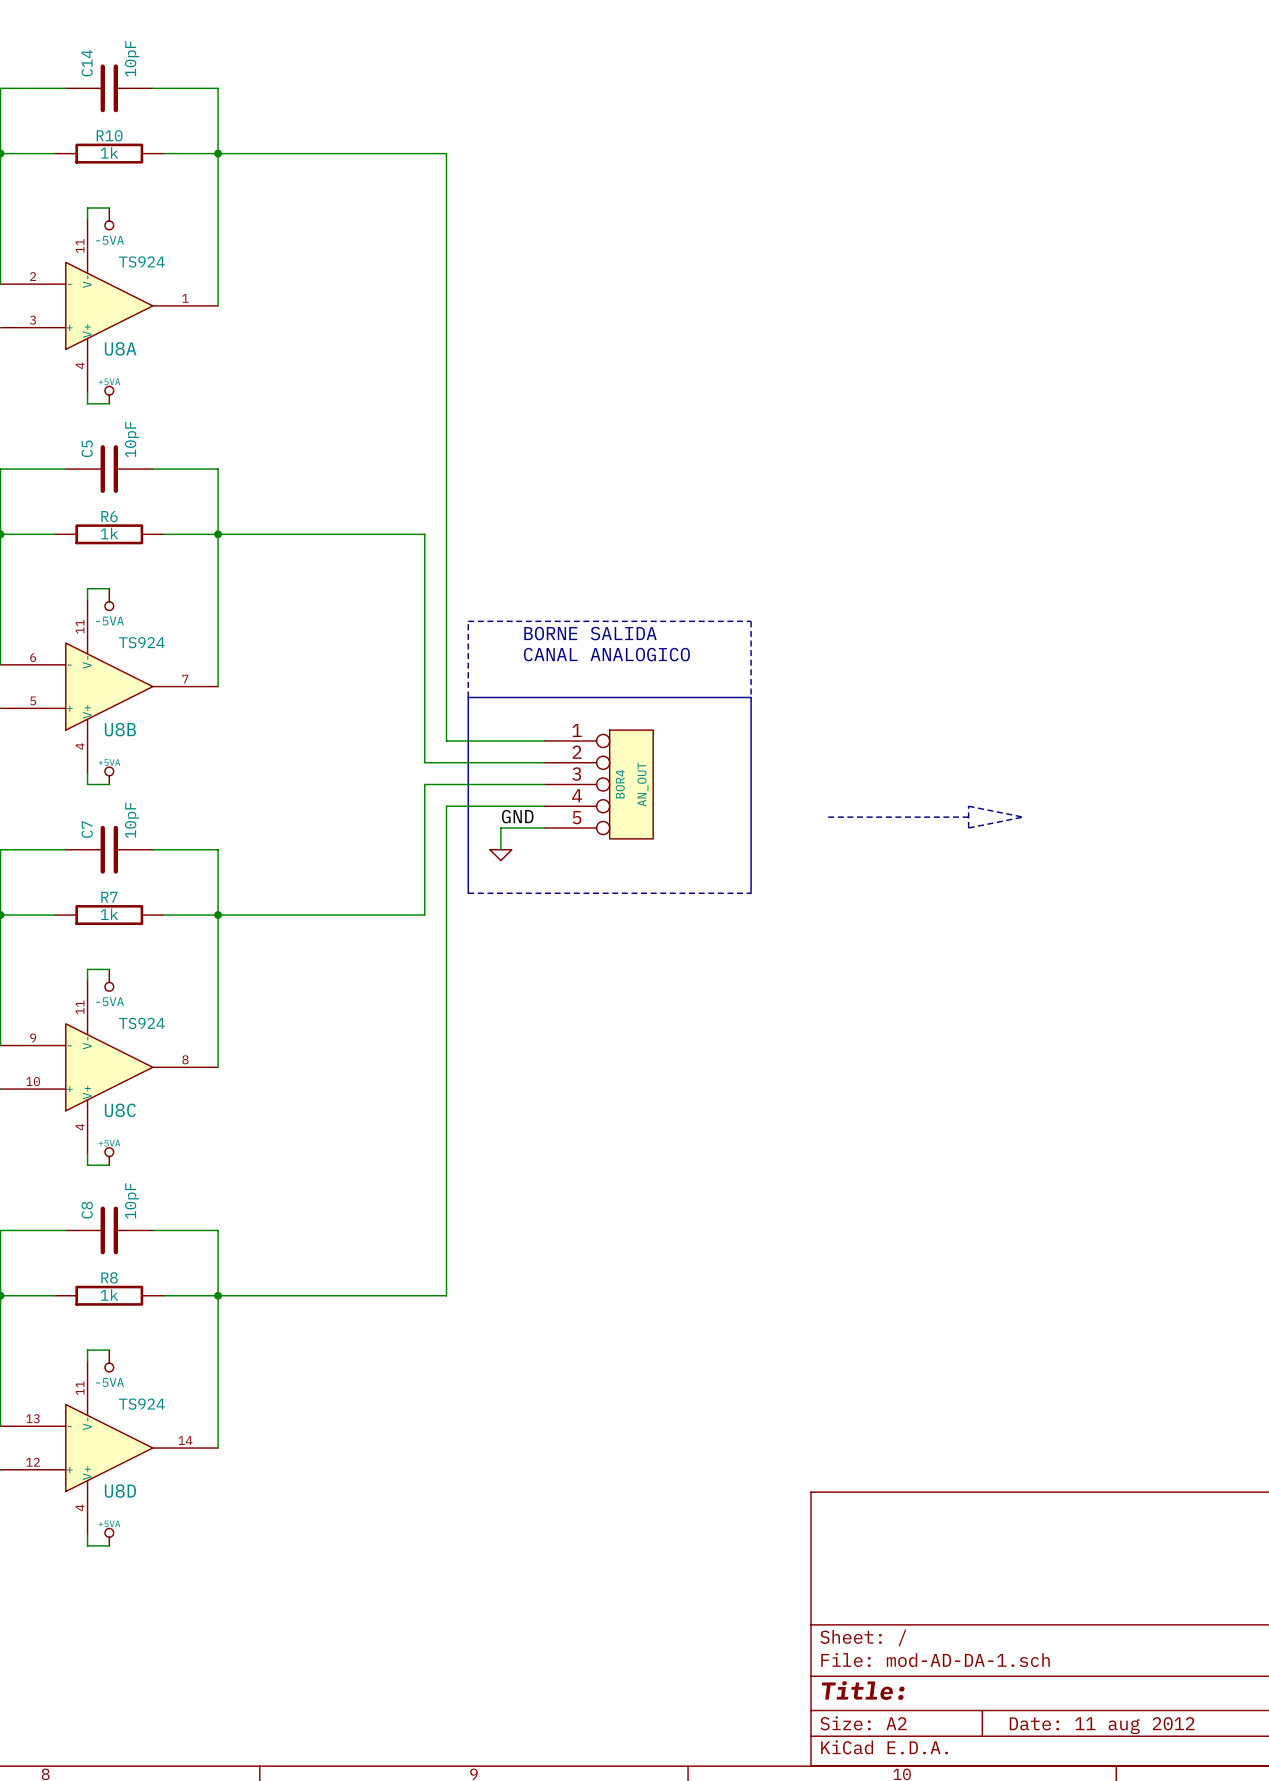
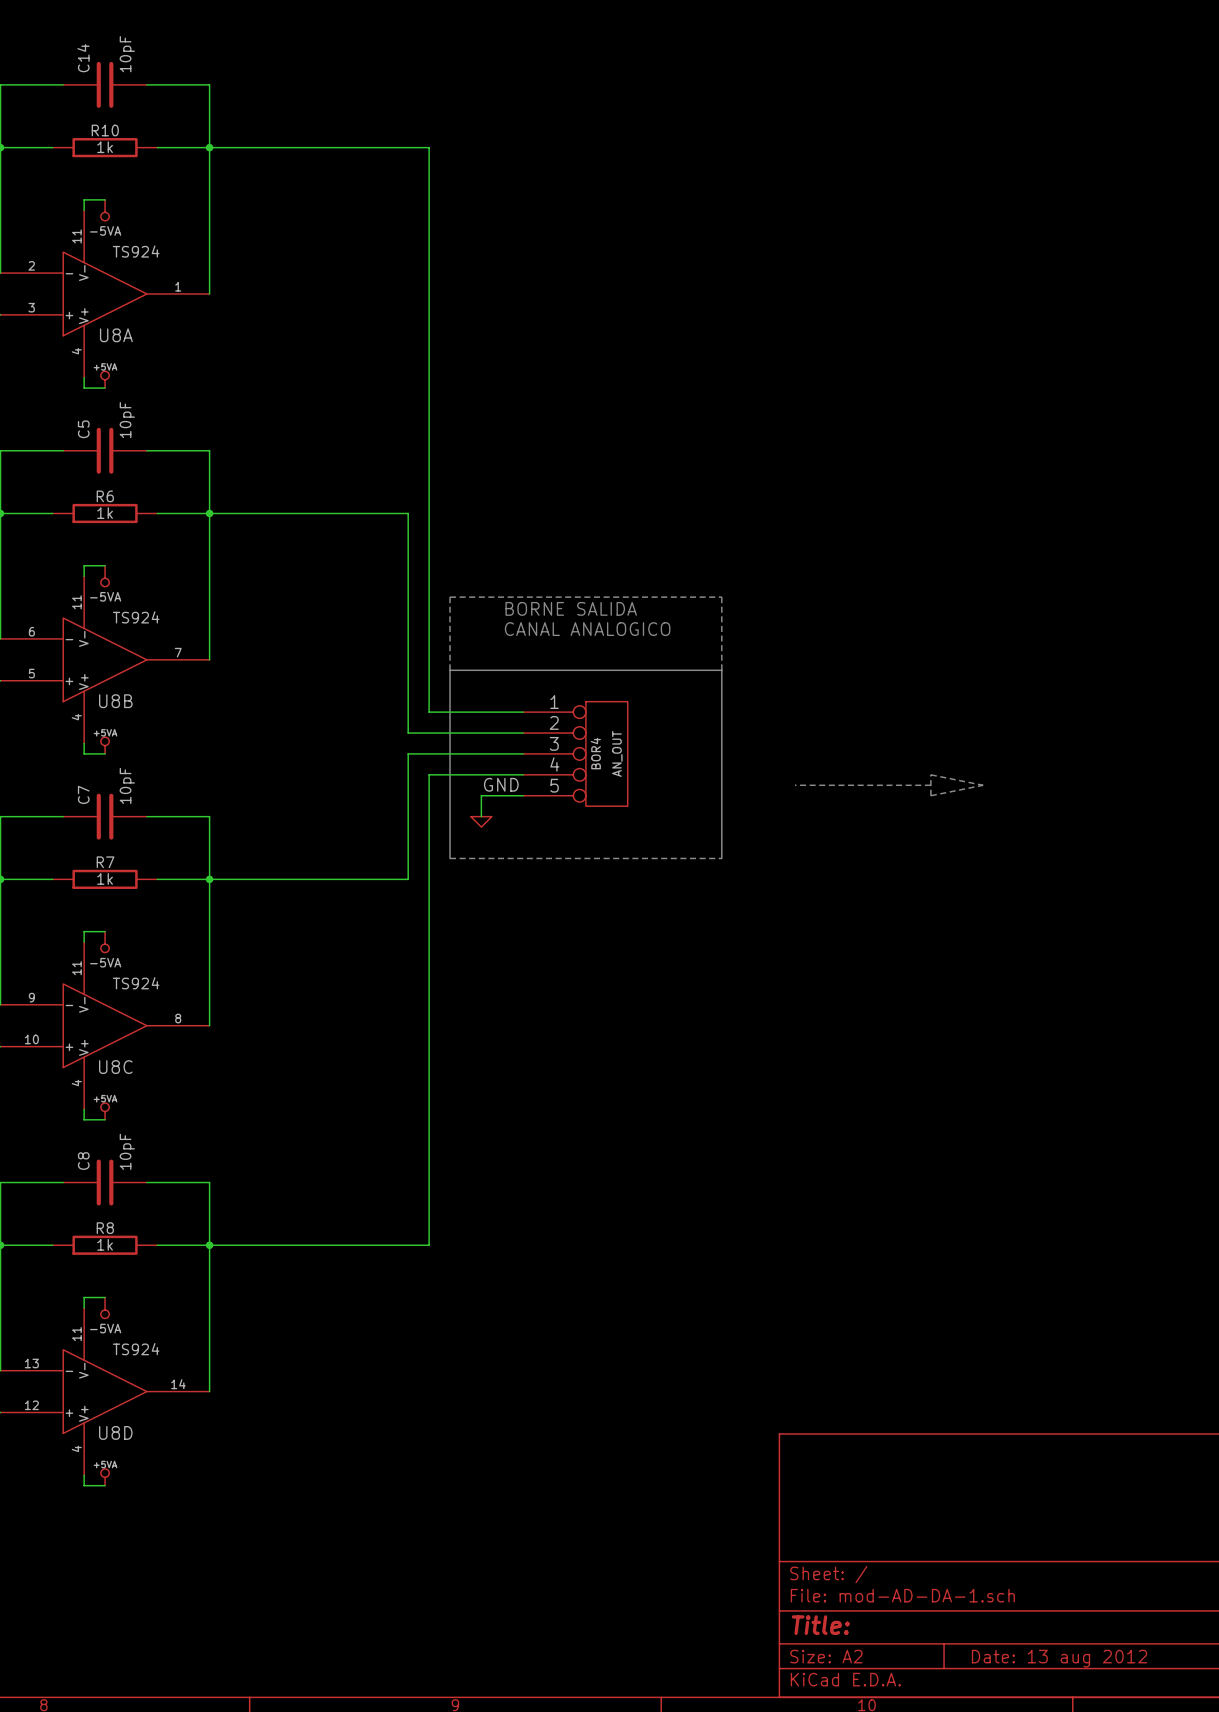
title block: Date: 11 aug 2012 (1102, 1725) -> Date: 13 aug 2012 (1059, 1658)

